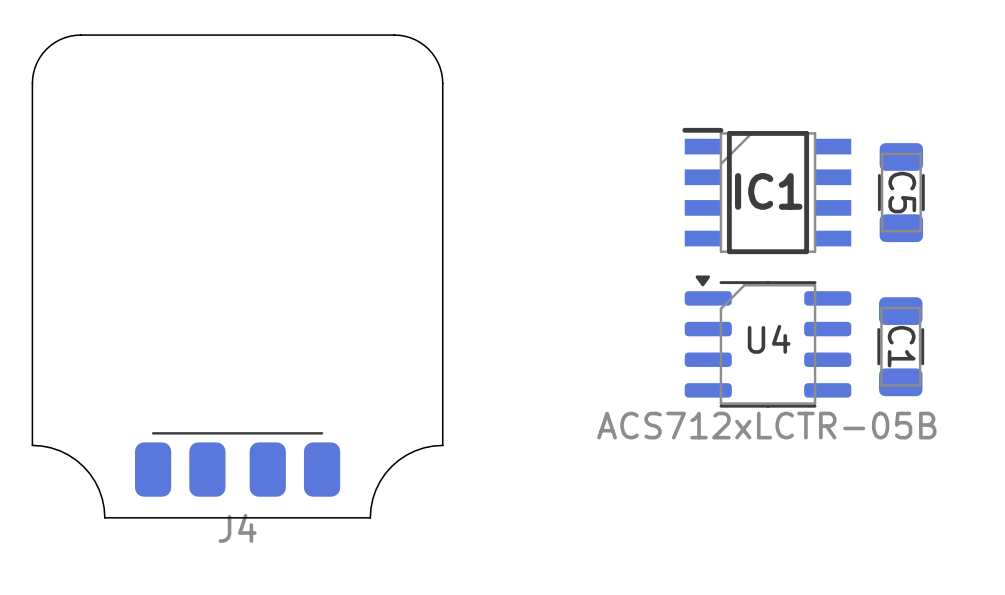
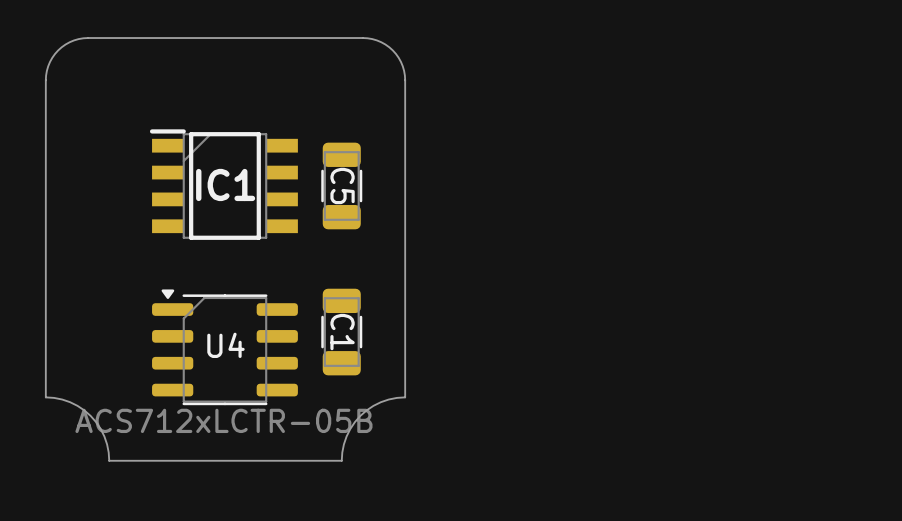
IC1 position: (766, 191) -> (223, 184)
C5 position: (901, 192) -> (341, 185)
U4 position: (768, 341) -> (224, 347)
C1 position: (900, 346) -> (341, 332)
J4: (237, 464) -> none

